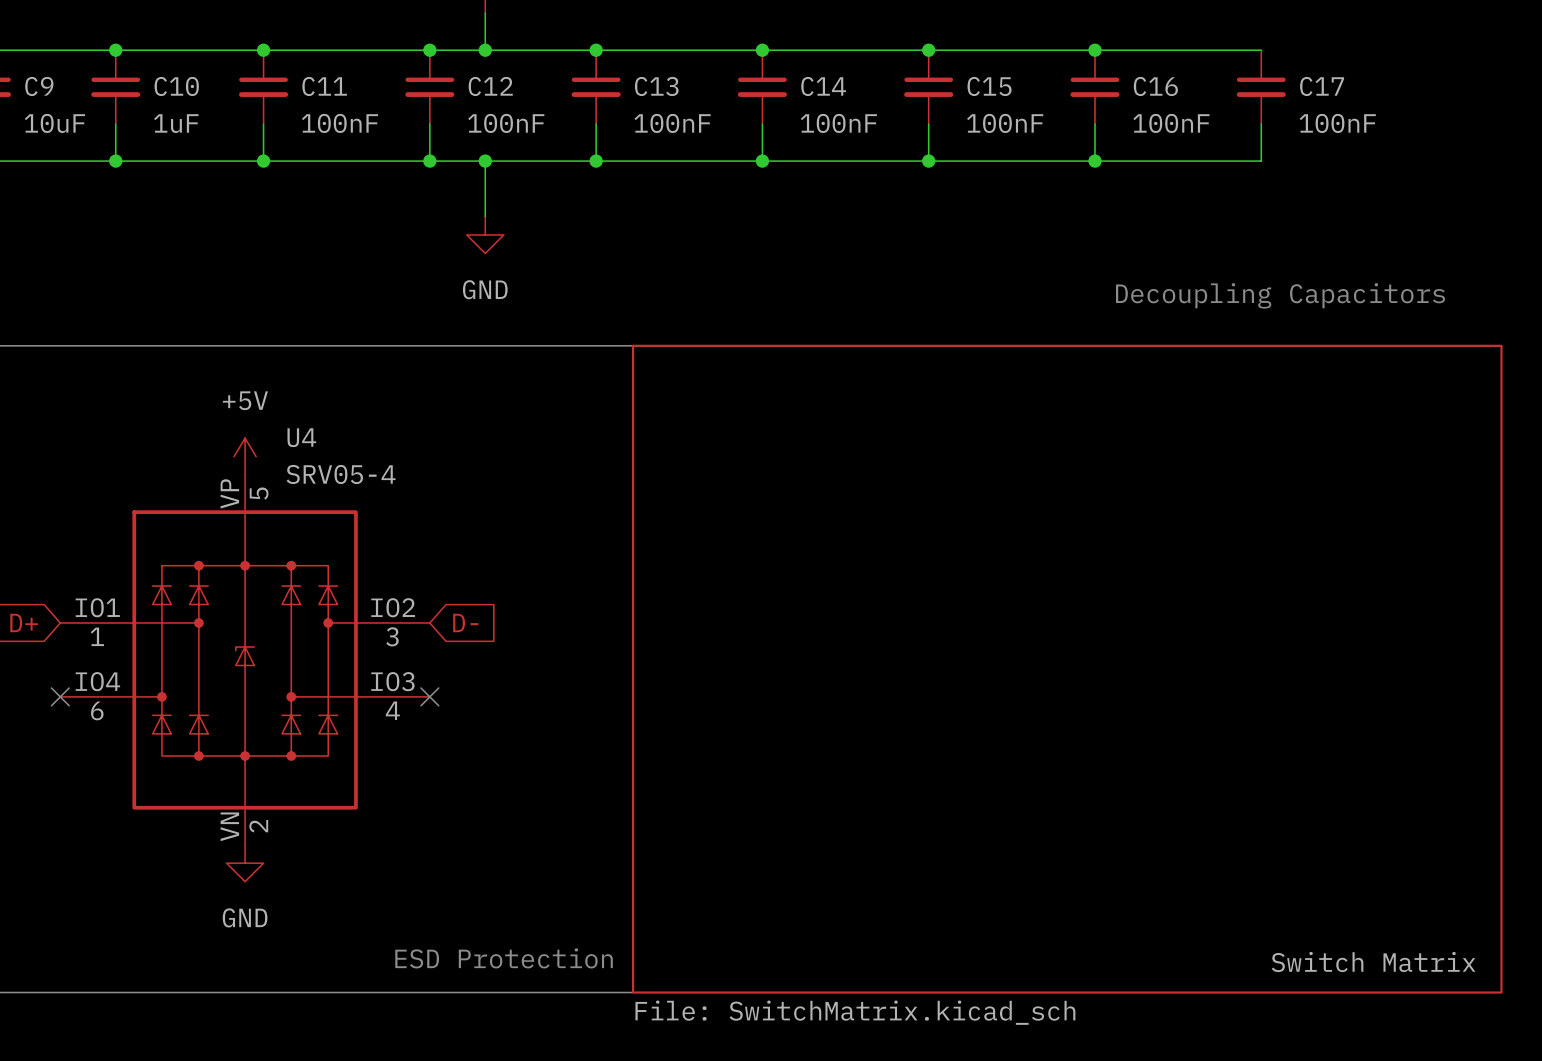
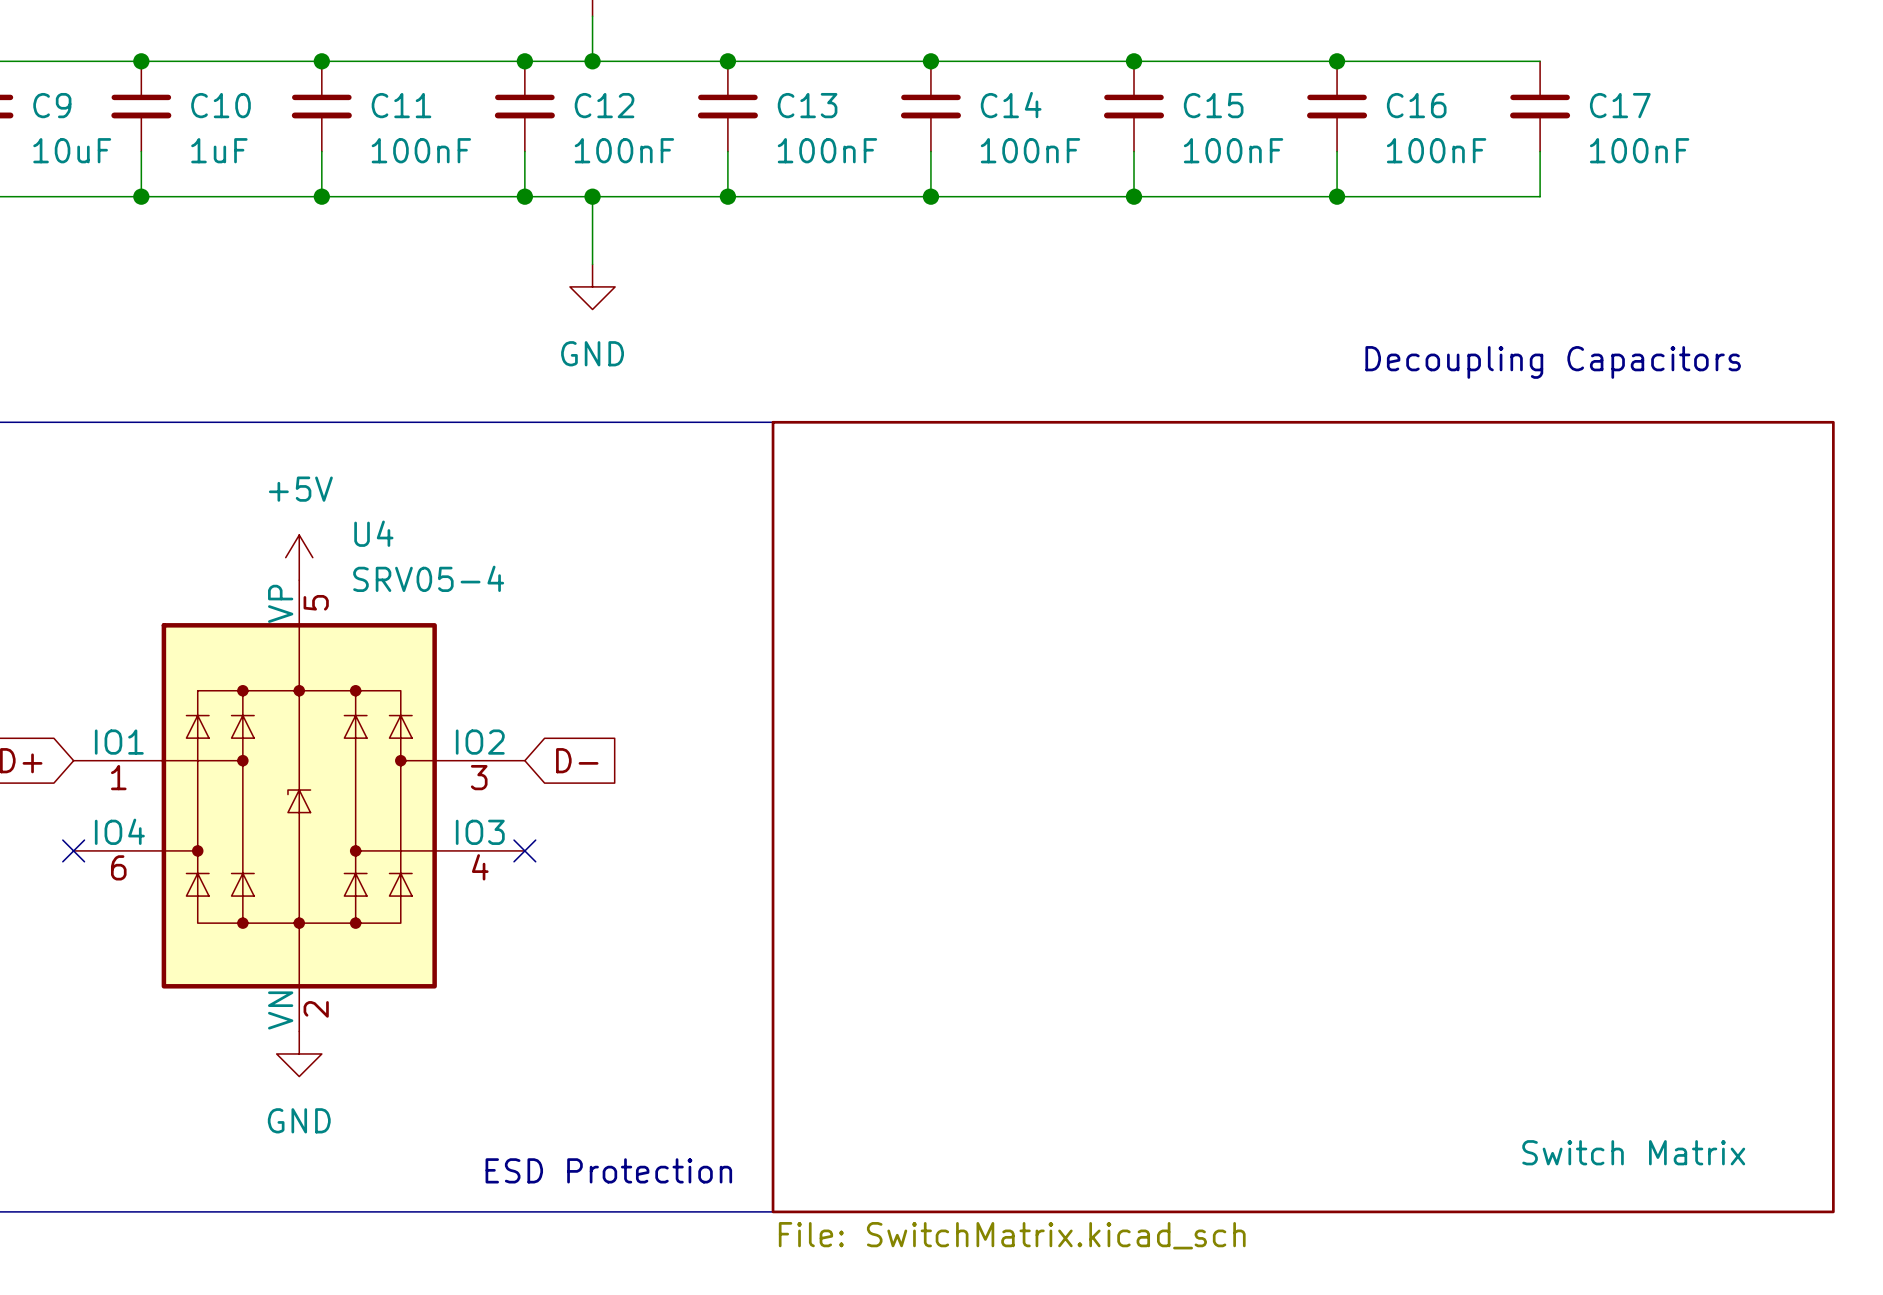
sheet Switch Matrix name position: Switch Matrix (1373, 962) -> Switch Matrix (1633, 1152)

